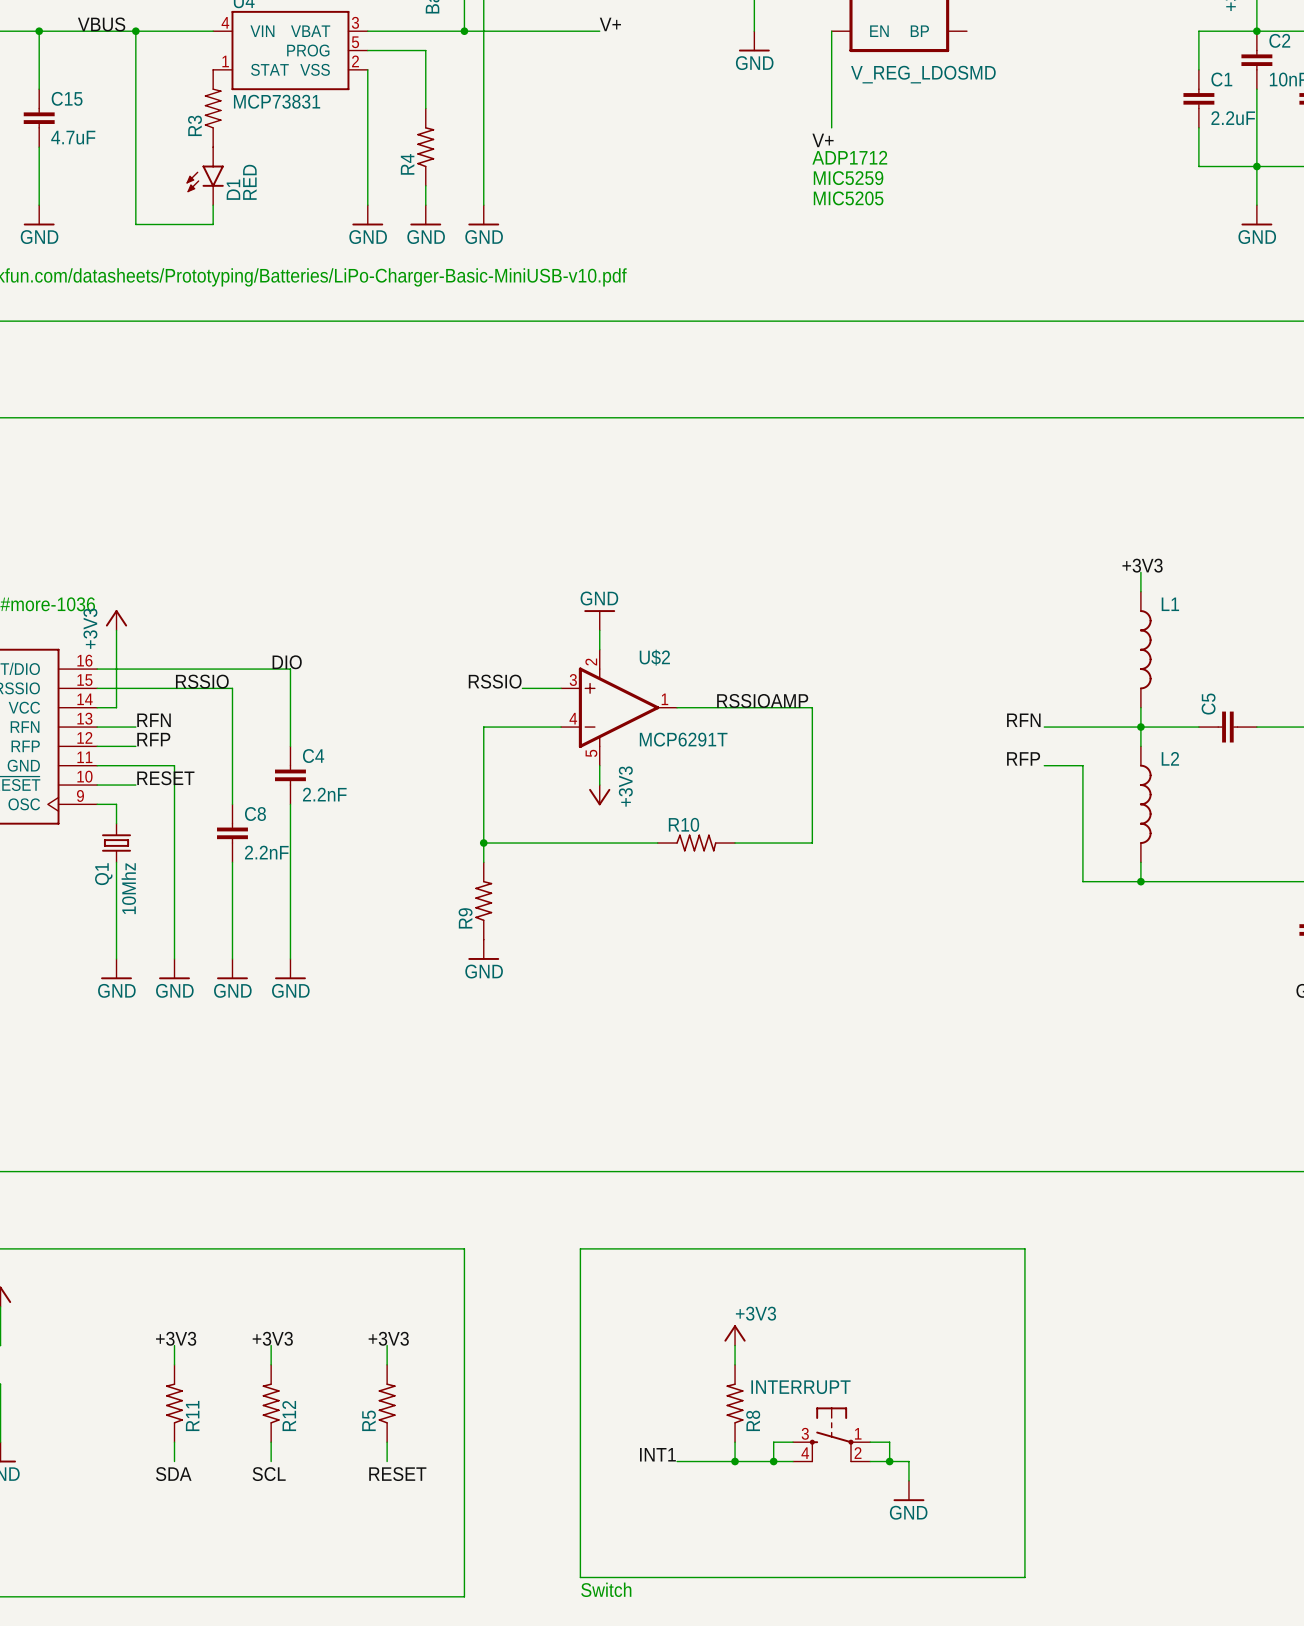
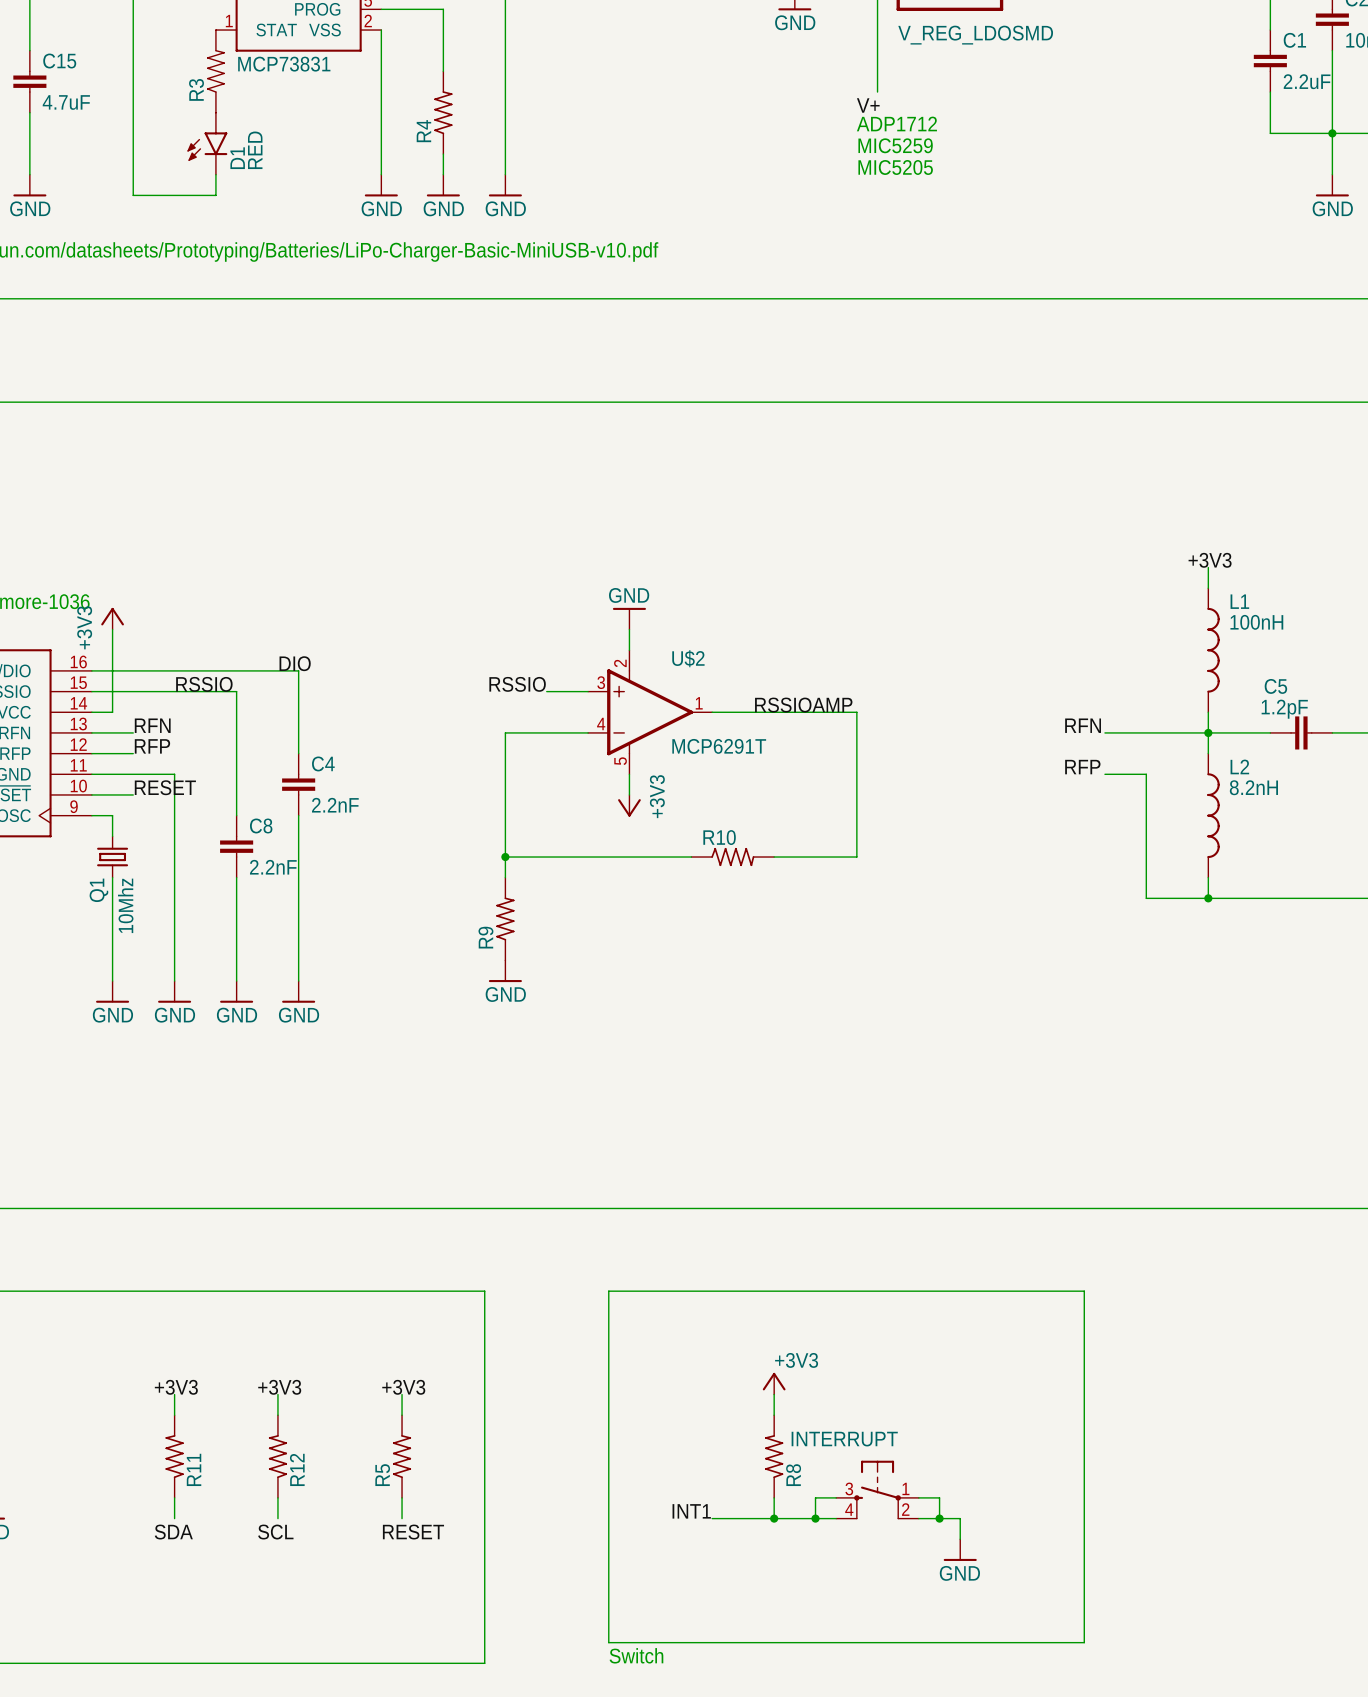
L1 value: none -> 100nH (1256, 622)
C5 name rotation: 0° (1208, 704) -> 90° clockwise (1275, 686)
C5 value: none -> 1.2pF (1284, 709)
L2 value: none -> 8.2nH (1253, 787)

